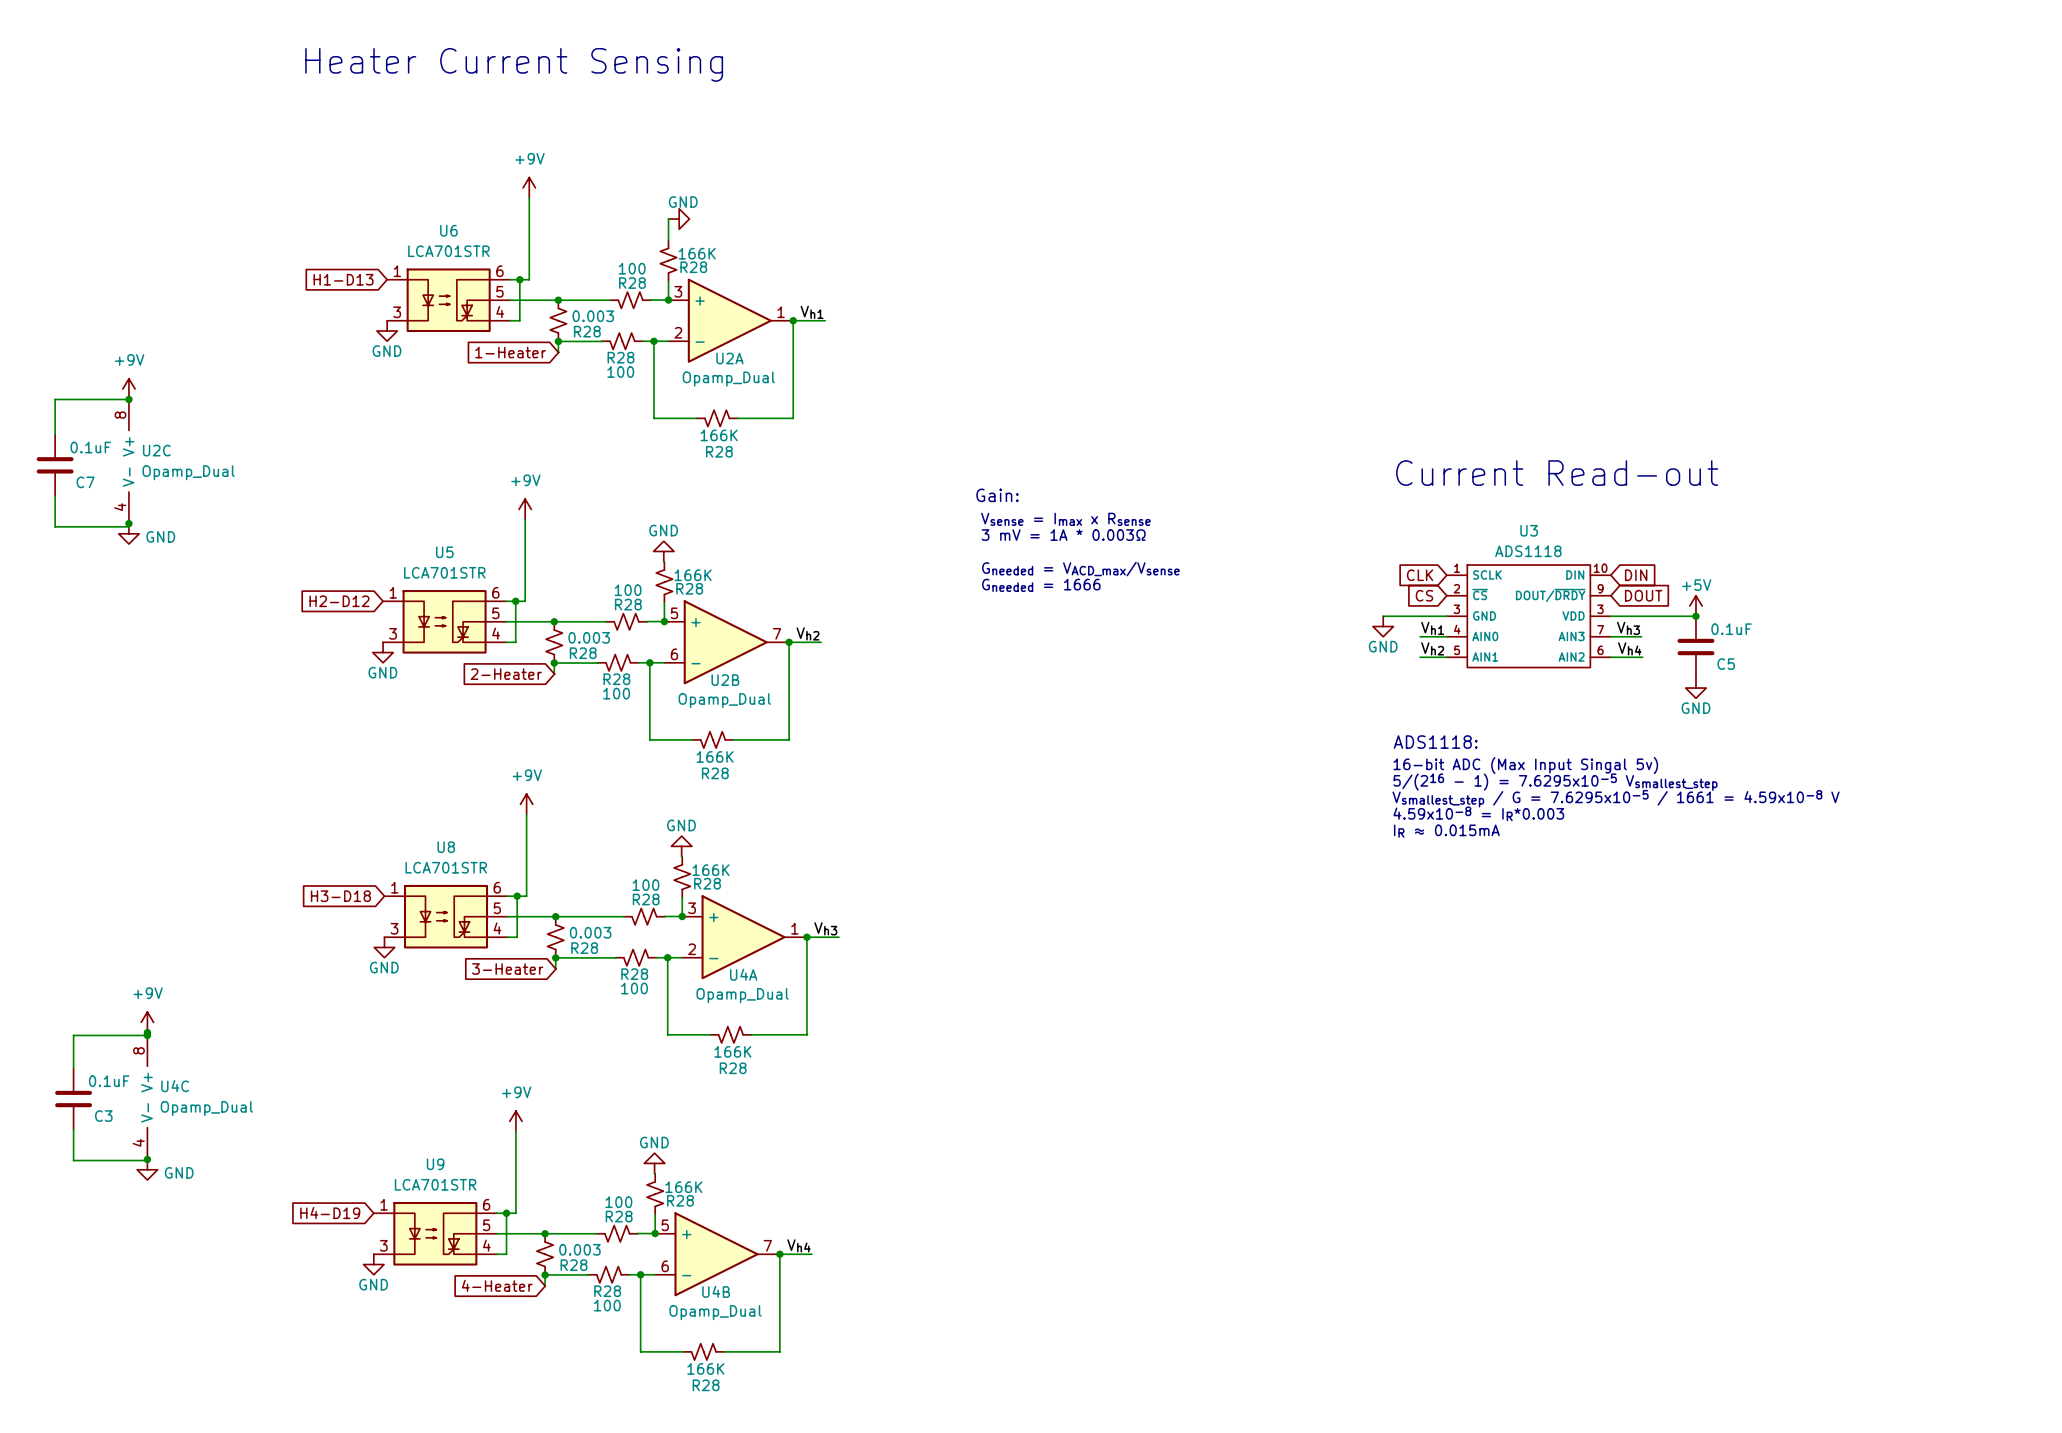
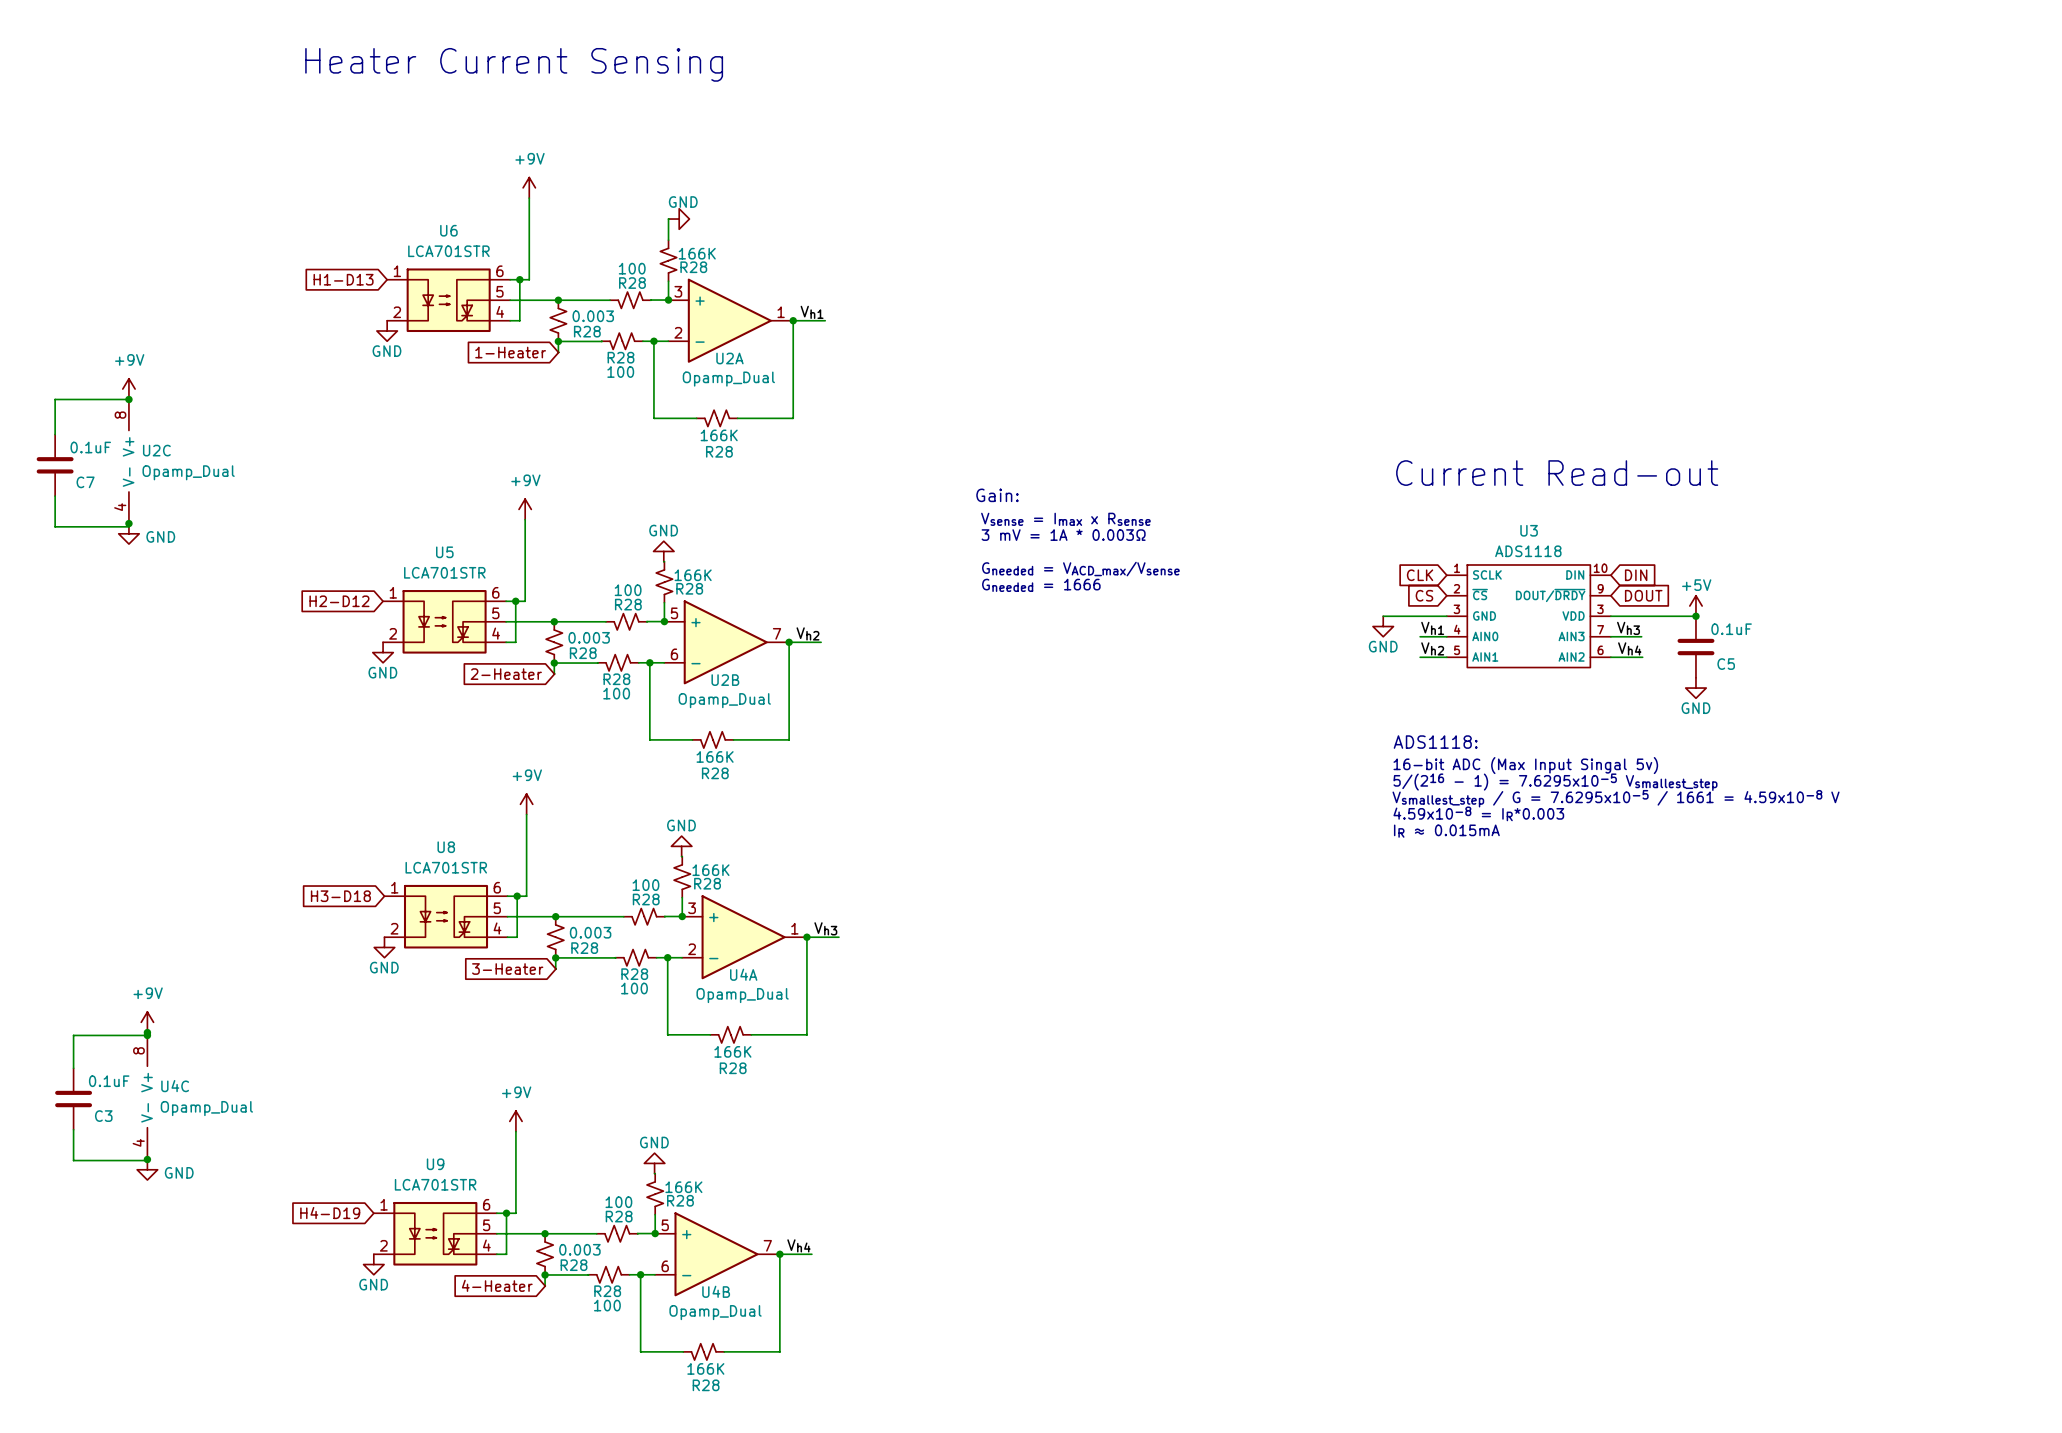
U6 pin number: 3 (397, 312) -> 2 (397, 312)
U5 pin number: 3 (393, 633) -> 2 (393, 633)
U8 pin number: 3 (394, 928) -> 2 (394, 928)
U9 pin number: 3 (383, 1245) -> 2 (383, 1245)

